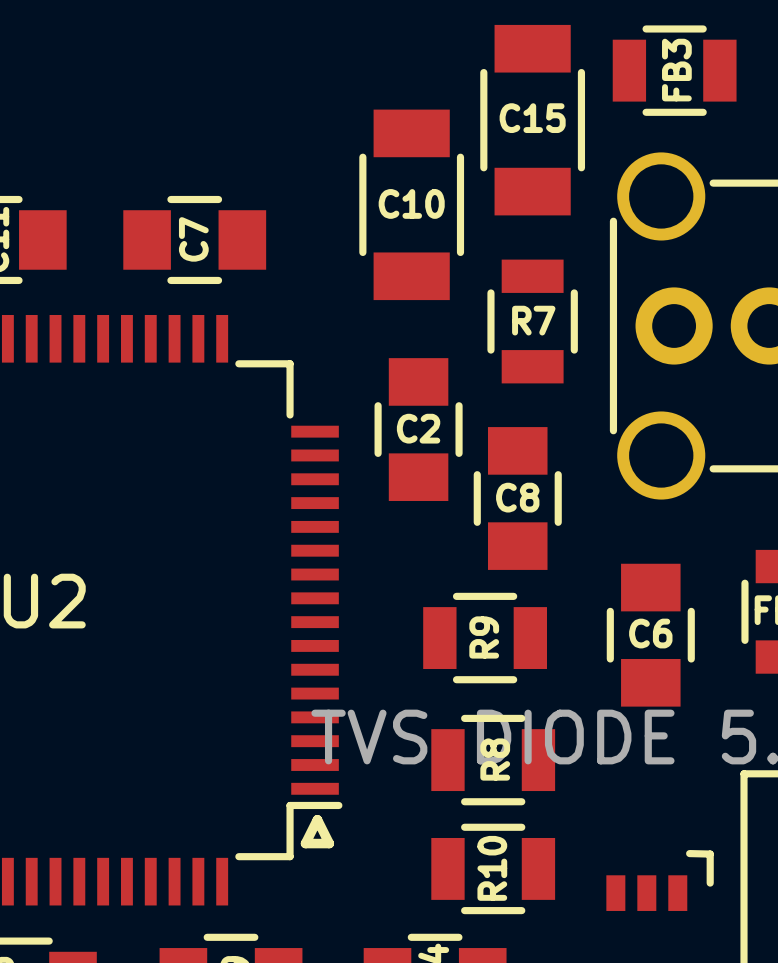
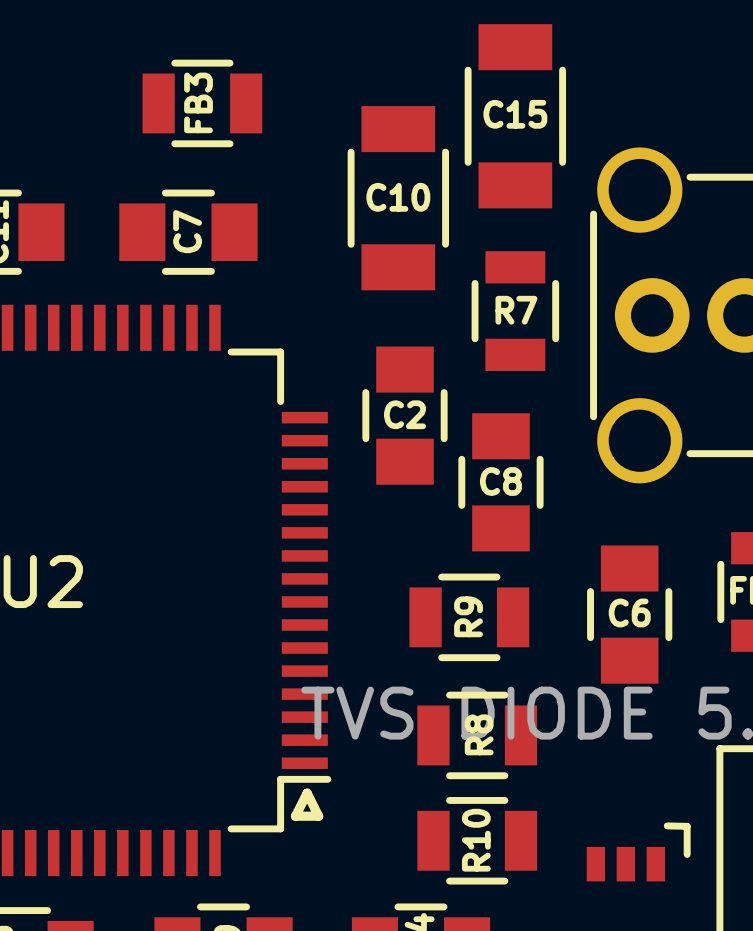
FB3 position: (674, 70) -> (202, 103)
FB3 name position: FB3 (676, 70) -> FB3 (198, 102)

